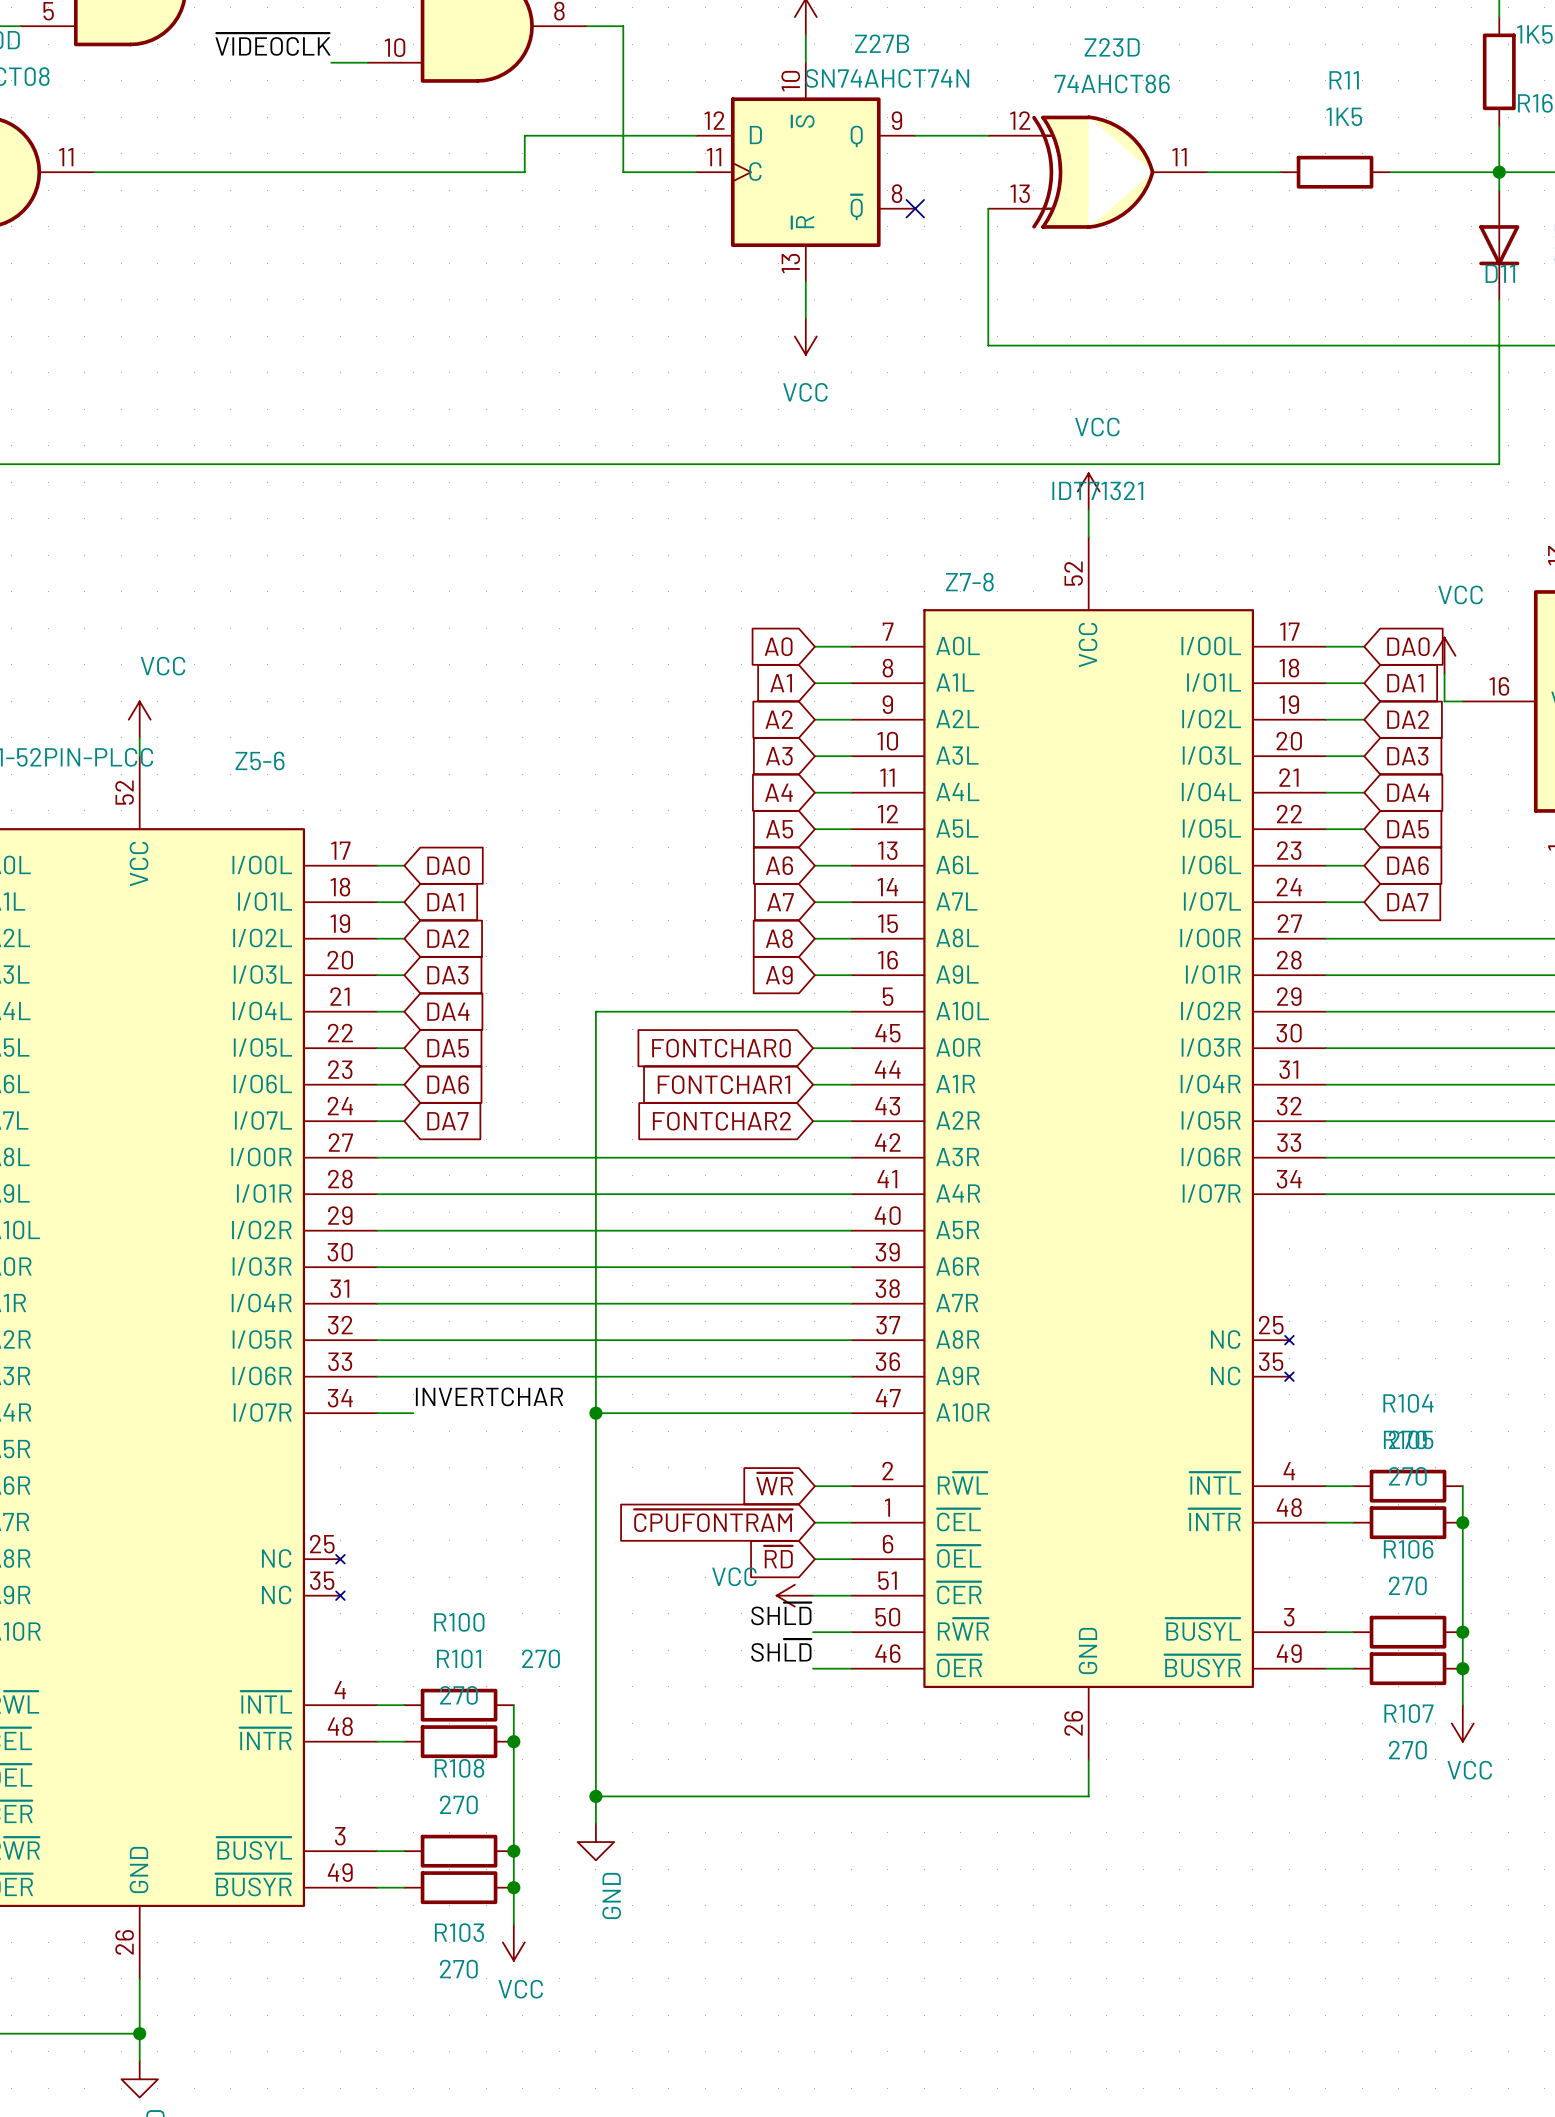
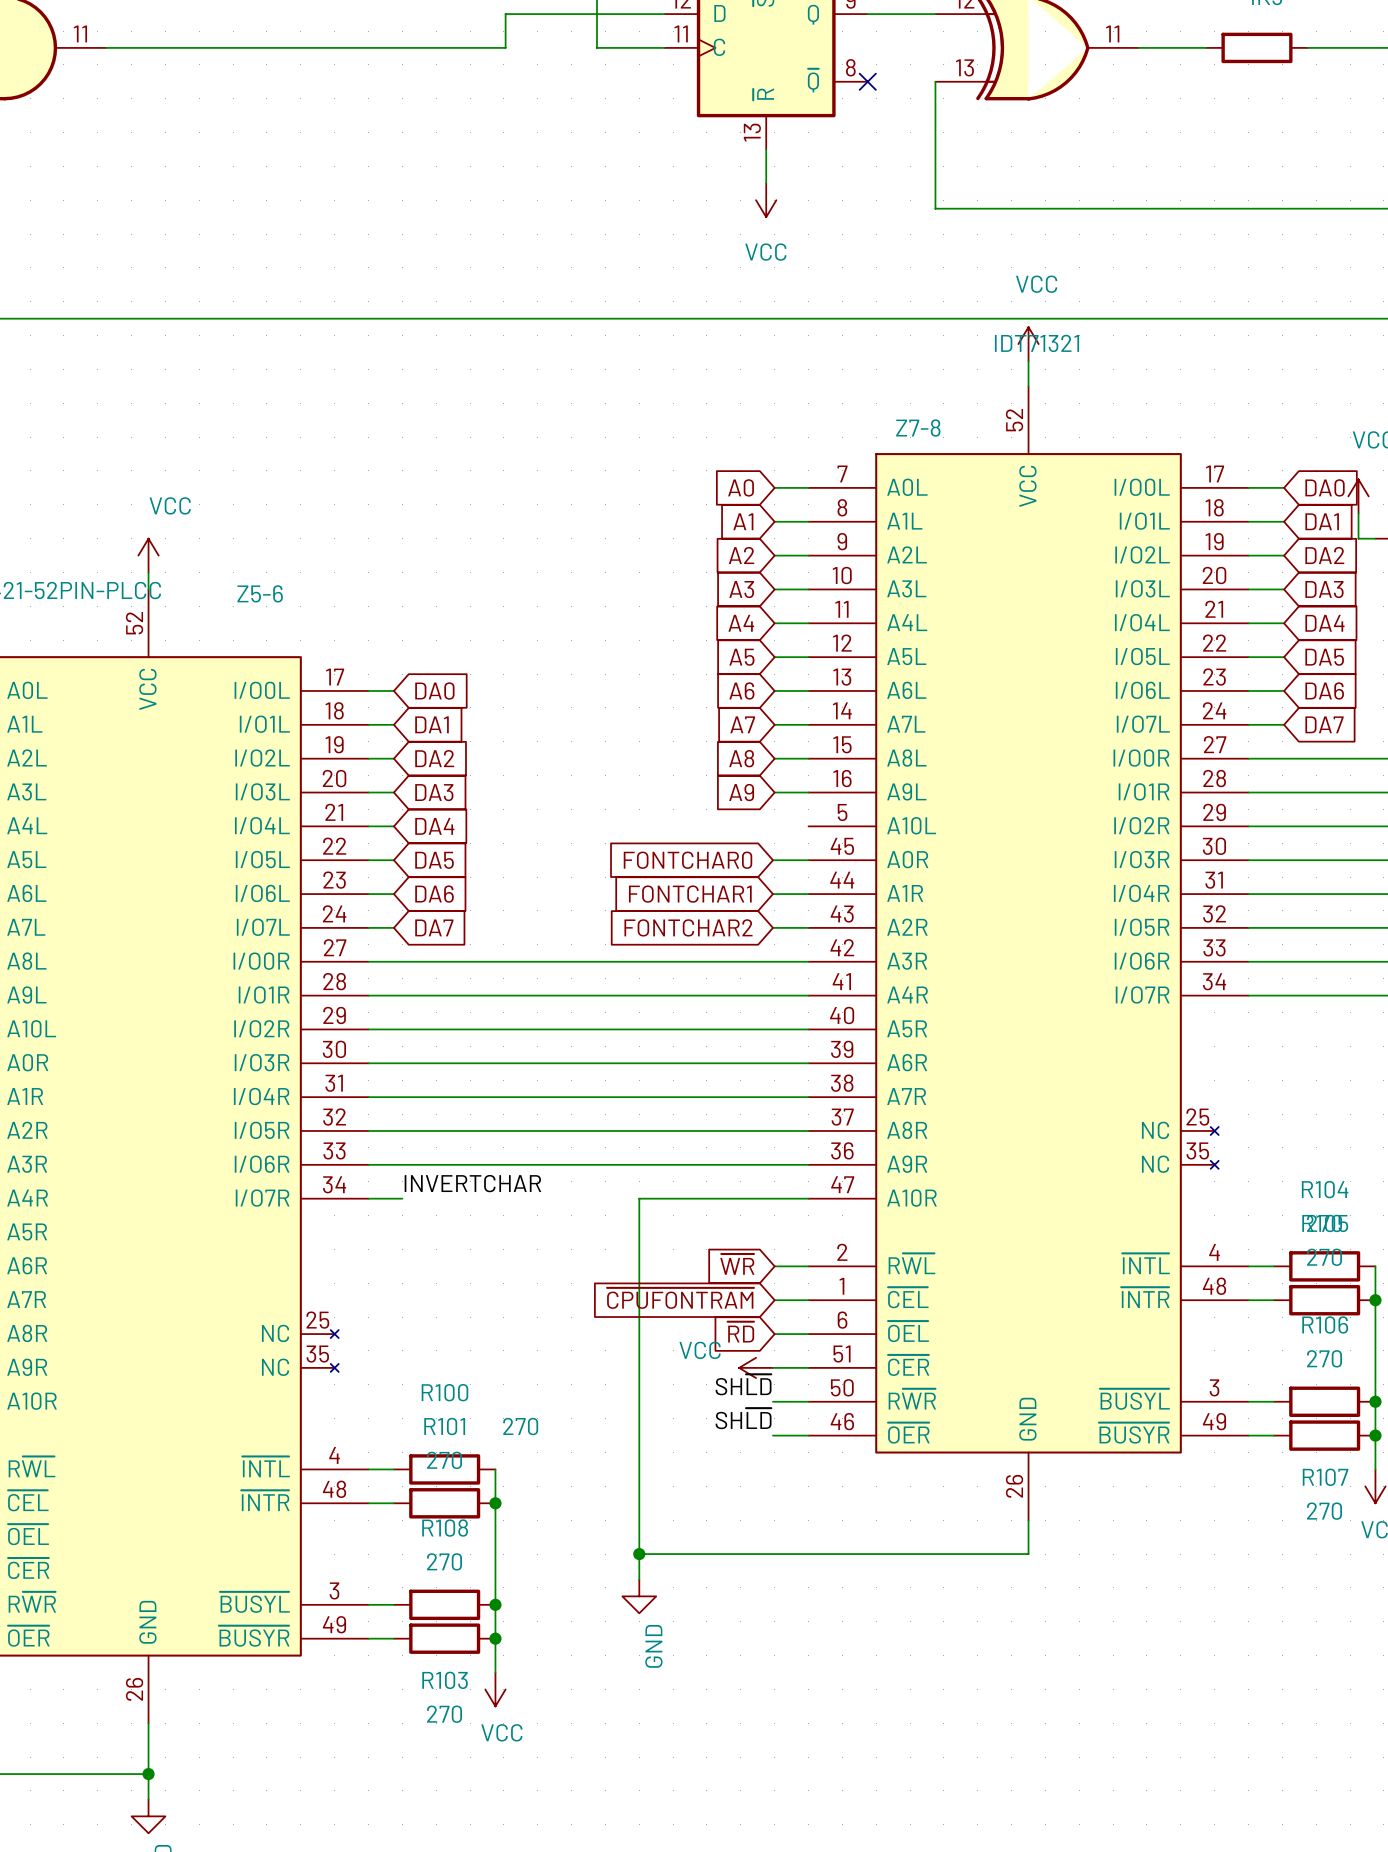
wire: (851, 1011) (595, 1011) (595, 1823) -> none
wire: (595, 1413) (668, 1413) -> (639, 1579) (639, 1198)
junction: (595, 1413) -> none
wire: (595, 1796) (668, 1796) -> none
junction position: (595, 1796) -> (639, 1554)
power symbol position: GND (595, 1842) -> GND (639, 1596)

